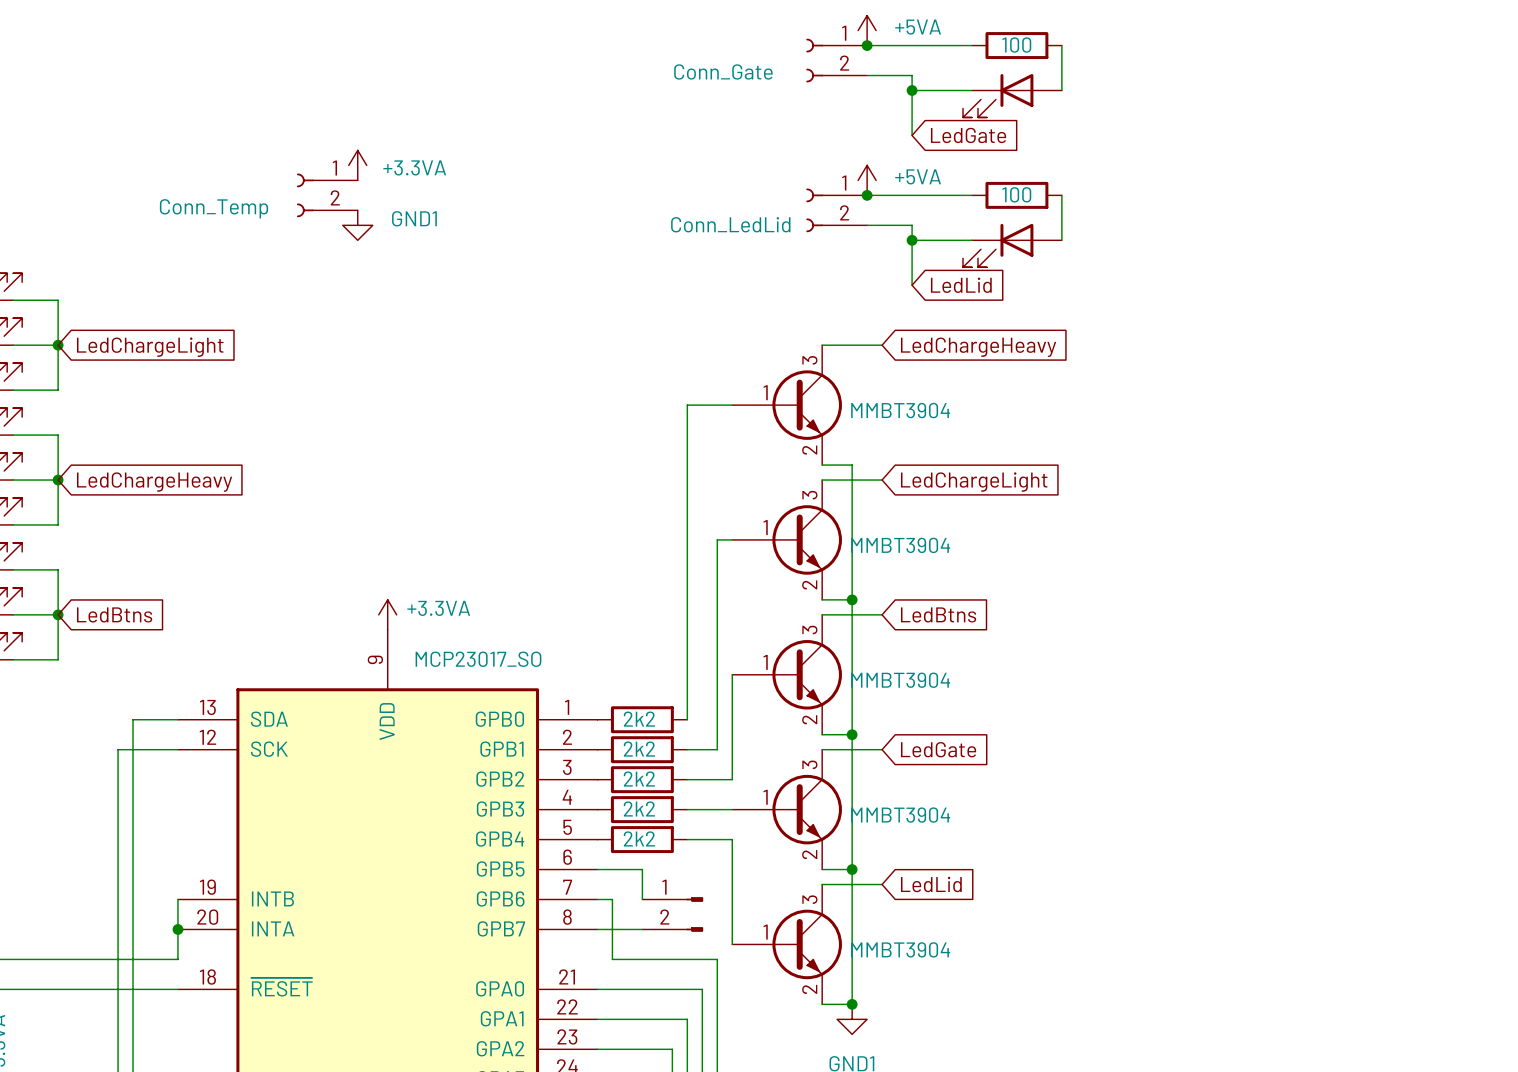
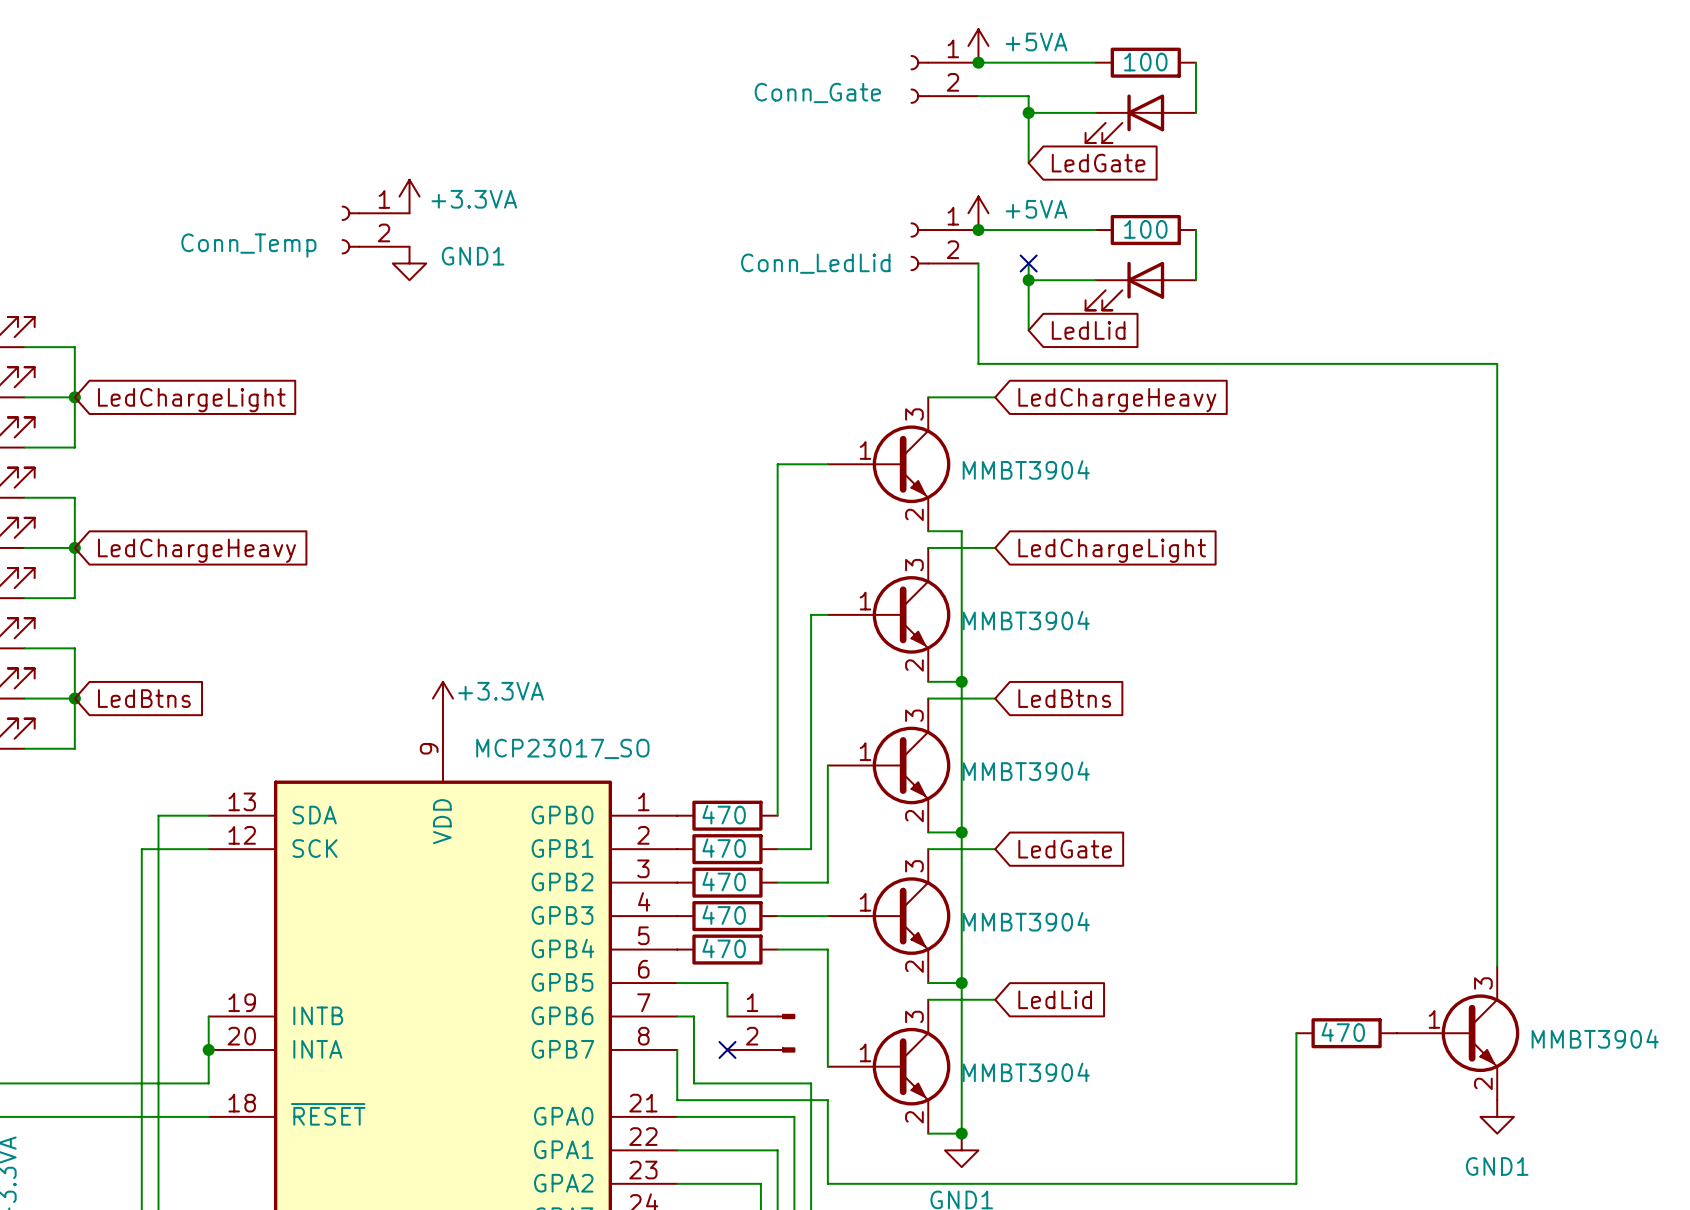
wire: (867, 225) (912, 225) -> (978, 263) (978, 363) (1497, 363) (1497, 966)
no-connect mark: none -> (1028, 263)
part value: 2k2 (639, 719) -> 470 (724, 814)
part value: 2k2 (639, 749) -> 470 (724, 848)
part value: 2k2 (639, 779) -> 470 (724, 881)
part value: 2k2 (639, 808) -> 470 (724, 915)
part value: 2k2 (639, 838) -> 470 (724, 948)
part: none -> 470 (1346, 1033)
part: none -> MMBT3904 (1458, 1033)
wire: (597, 929) (642, 929) -> (677, 1049) (677, 1100) (827, 1100) (827, 1183) (1296, 1183) (1296, 1033)
no-connect mark: none -> (727, 1049)
power symbol: none -> GND1 (1497, 1116)

